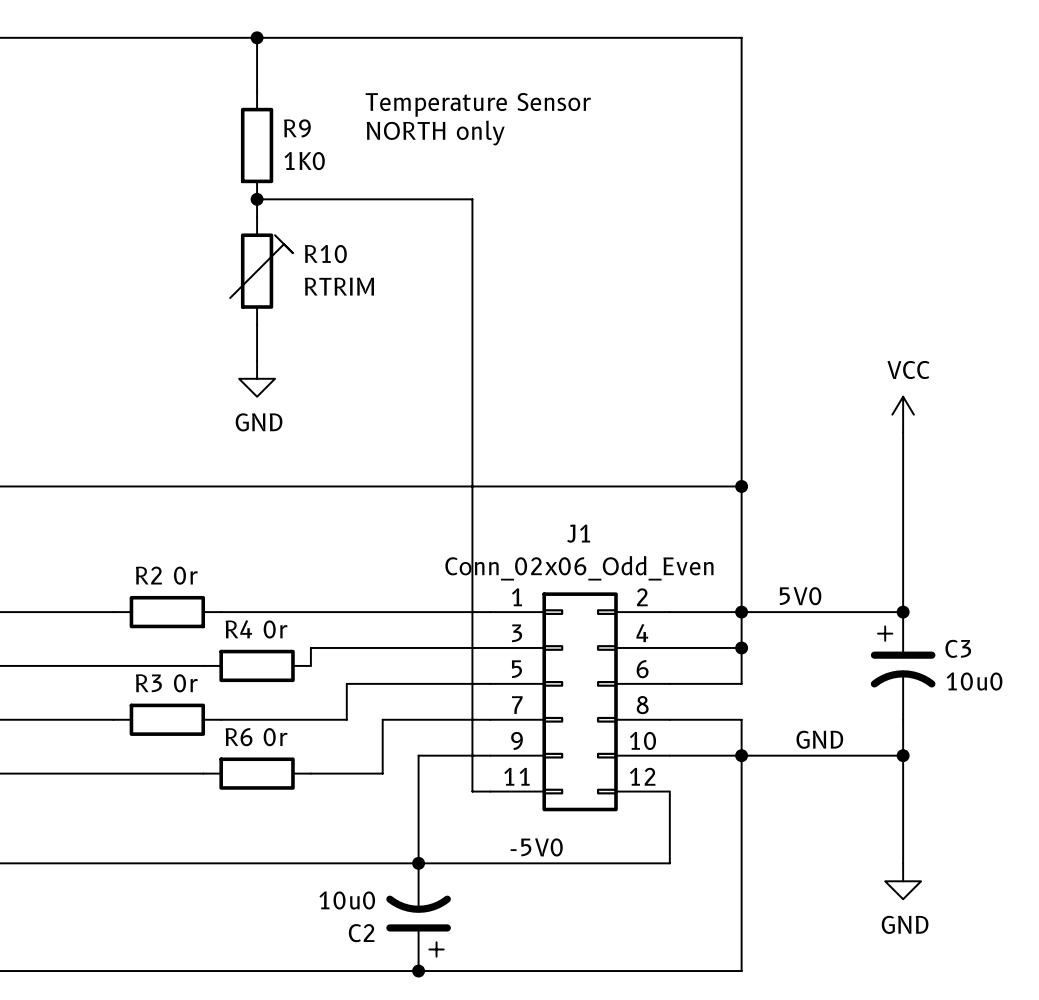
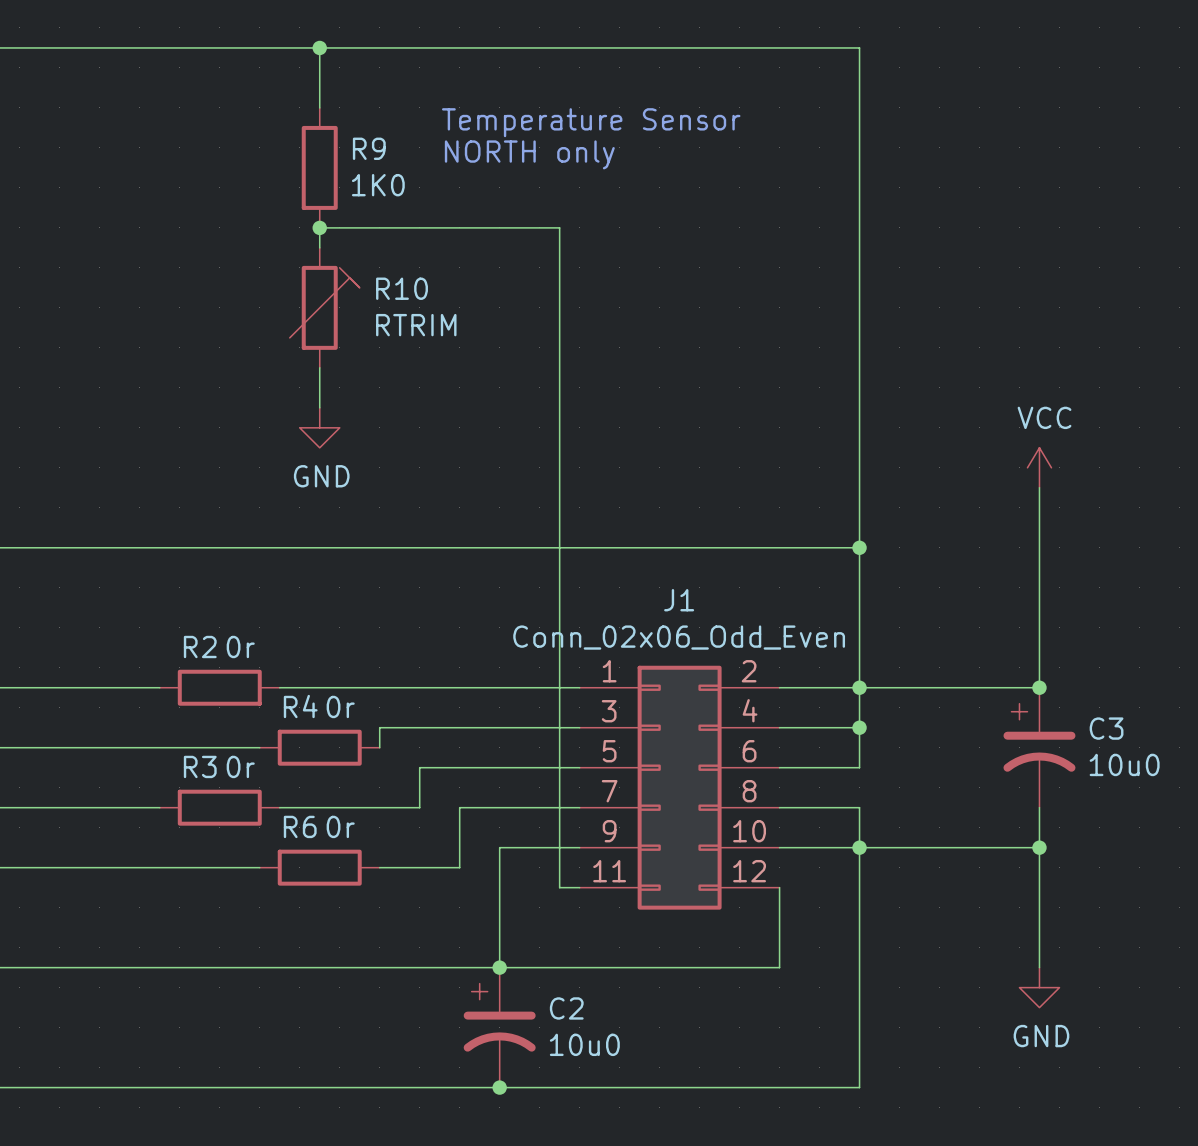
label: 5V0 (800, 596) -> none
label: GND (819, 739) -> none
label: -5V0 (536, 847) -> none
C2 rotation: 0° (418, 926) -> 180° (499, 1017)

